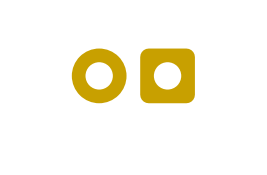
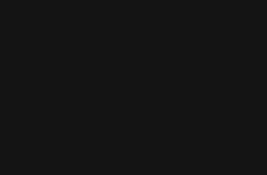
part: (133, 75) -> none

